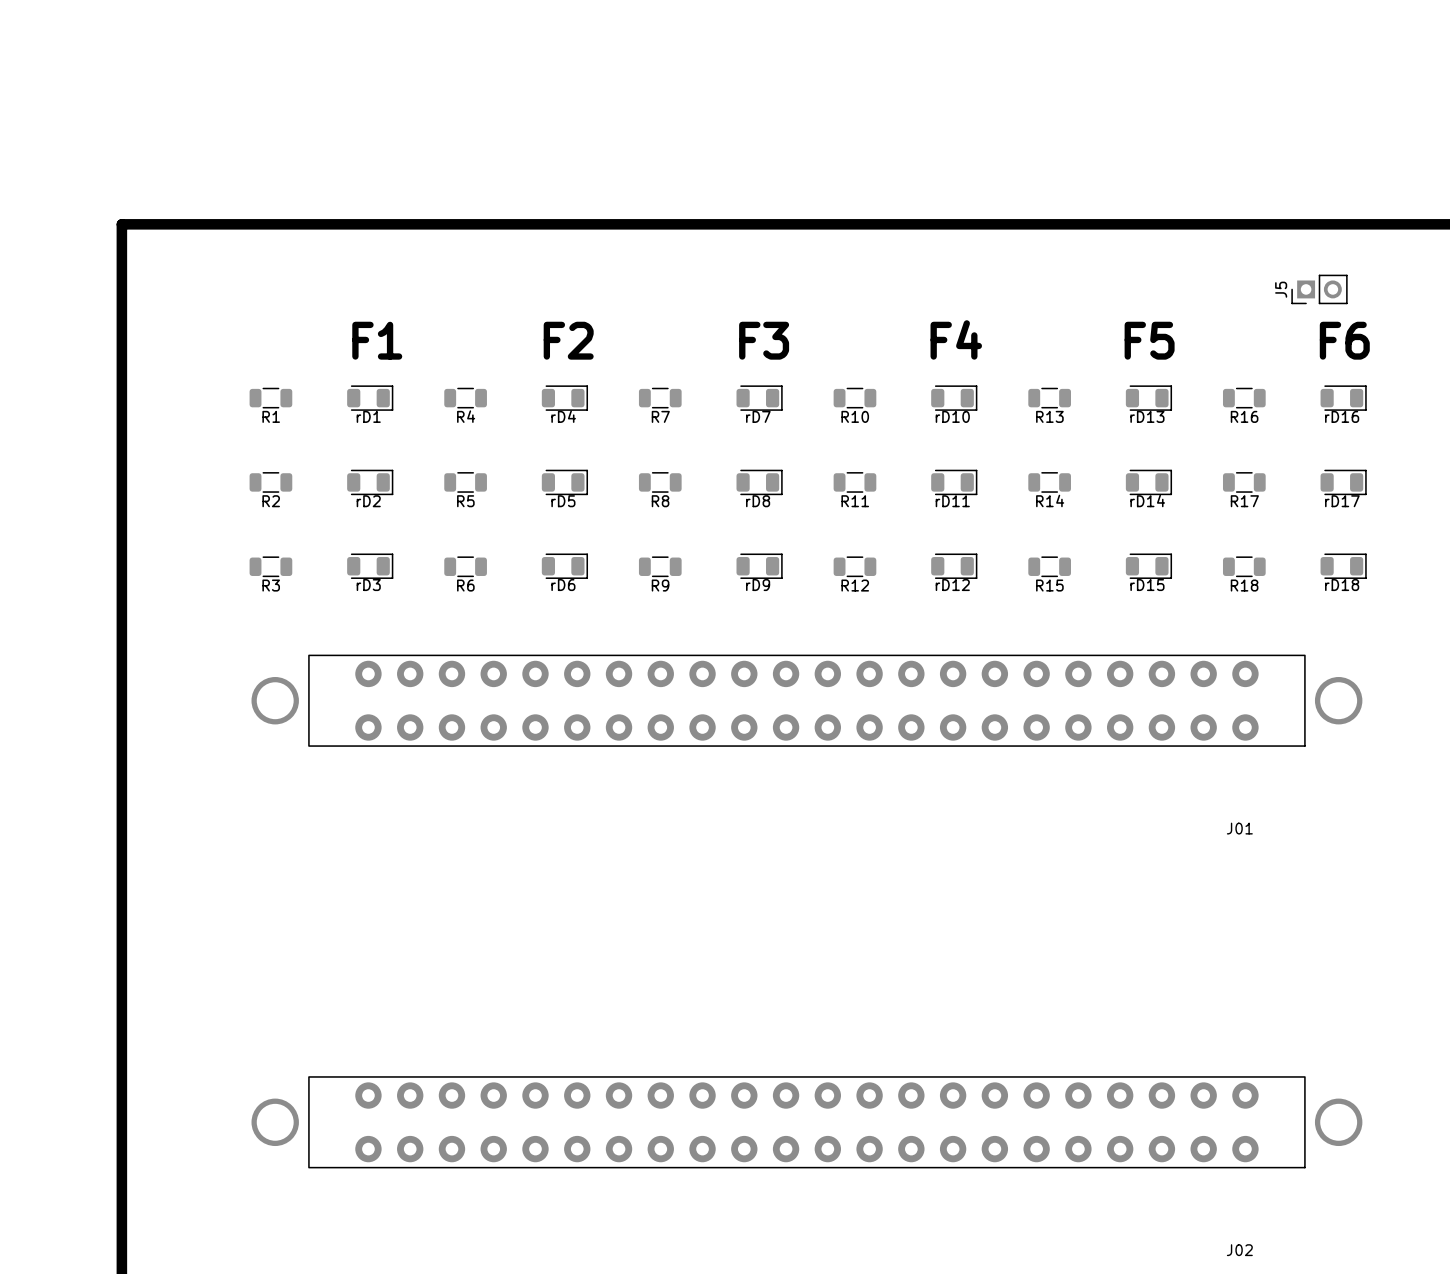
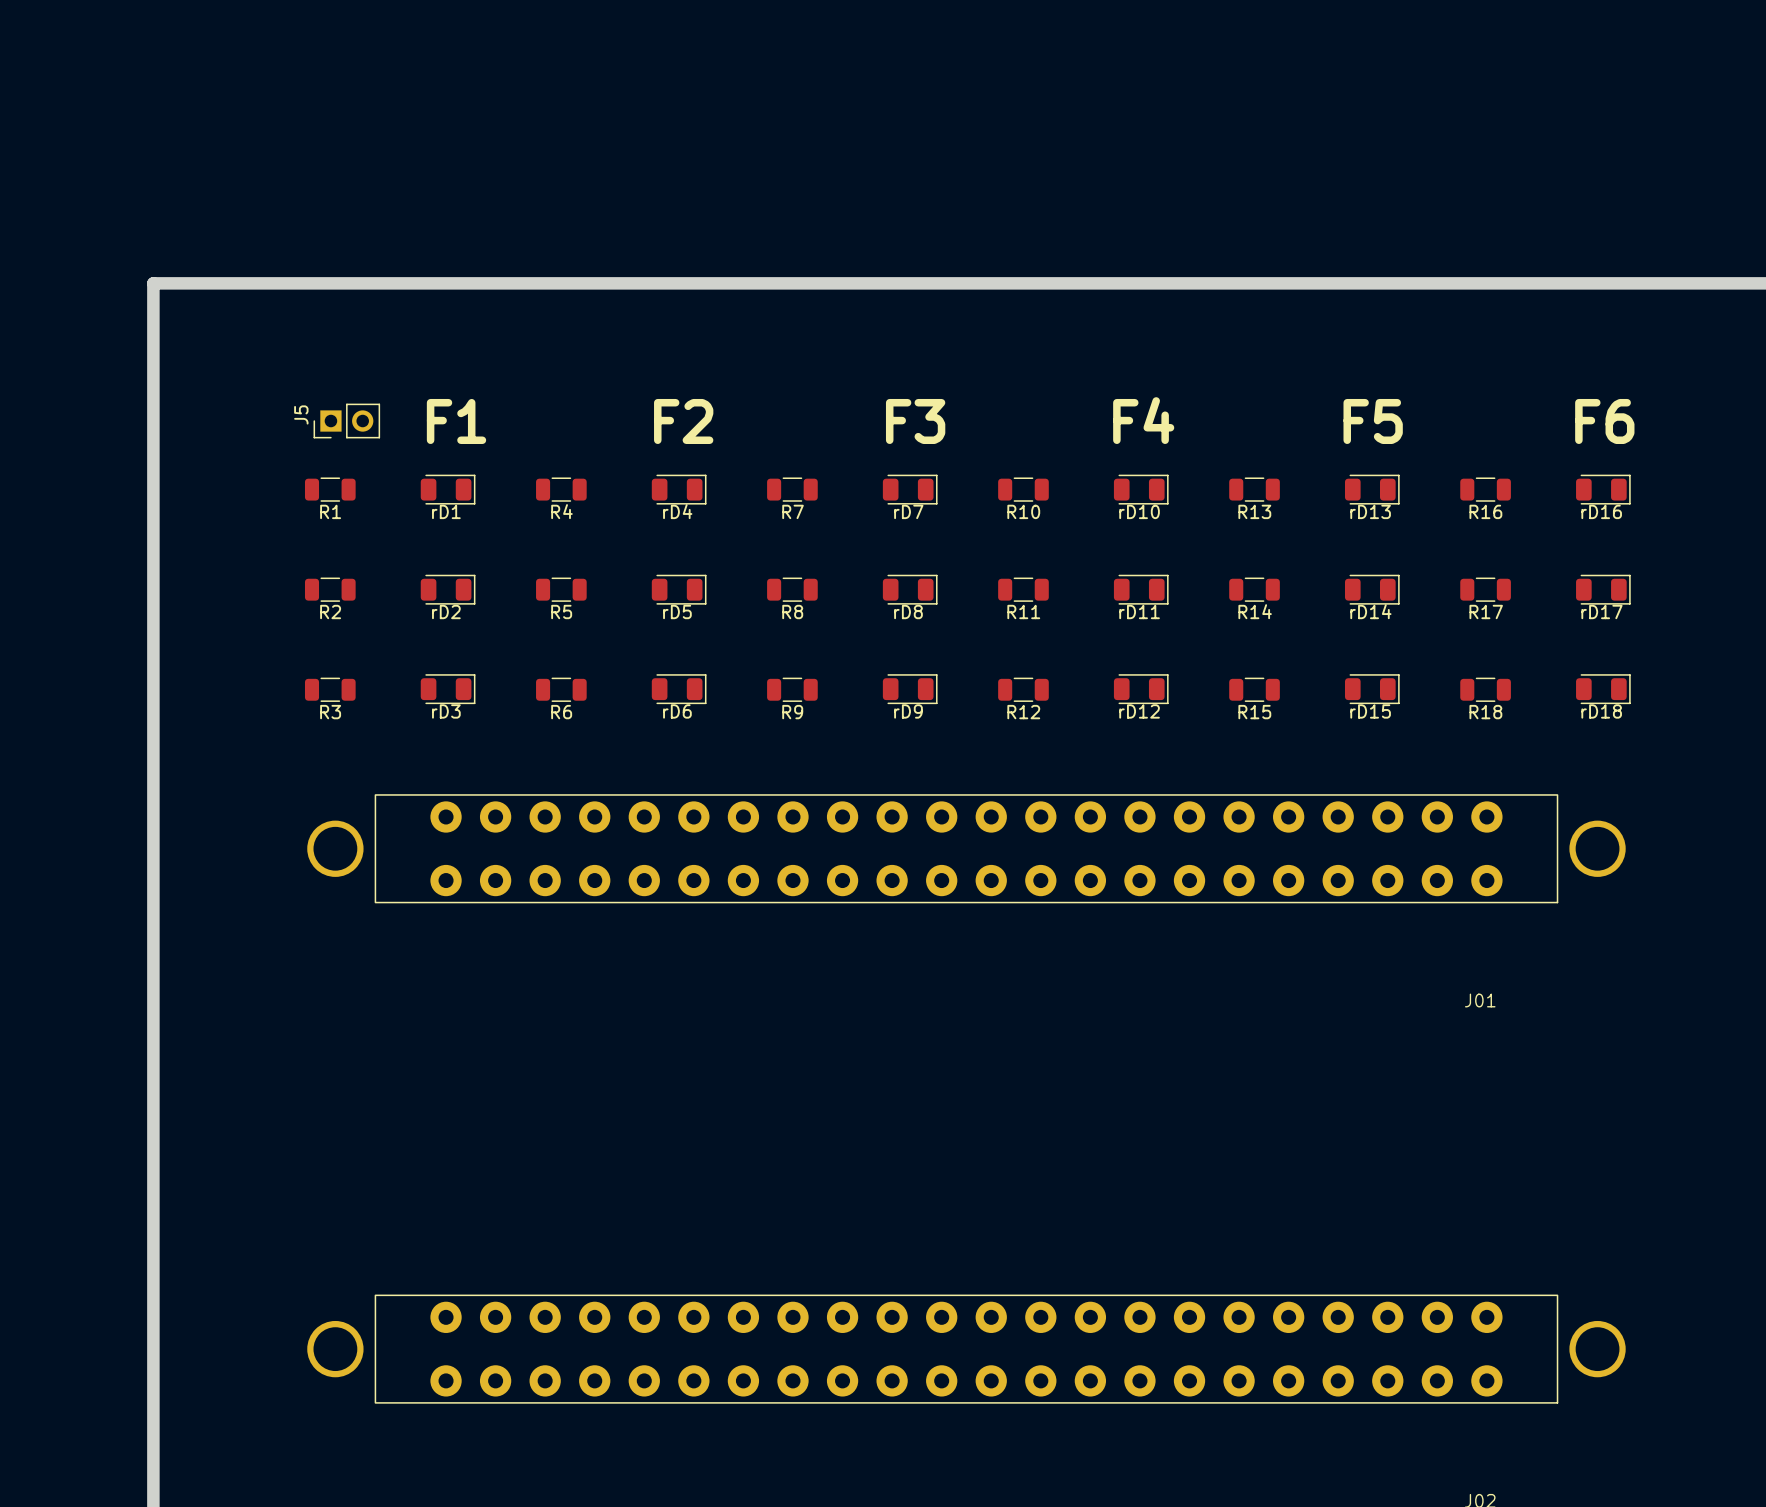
J5 name position: J5 (1281, 289) -> J5 (301, 414)
J5 position: (1319, 289) -> (346, 421)

